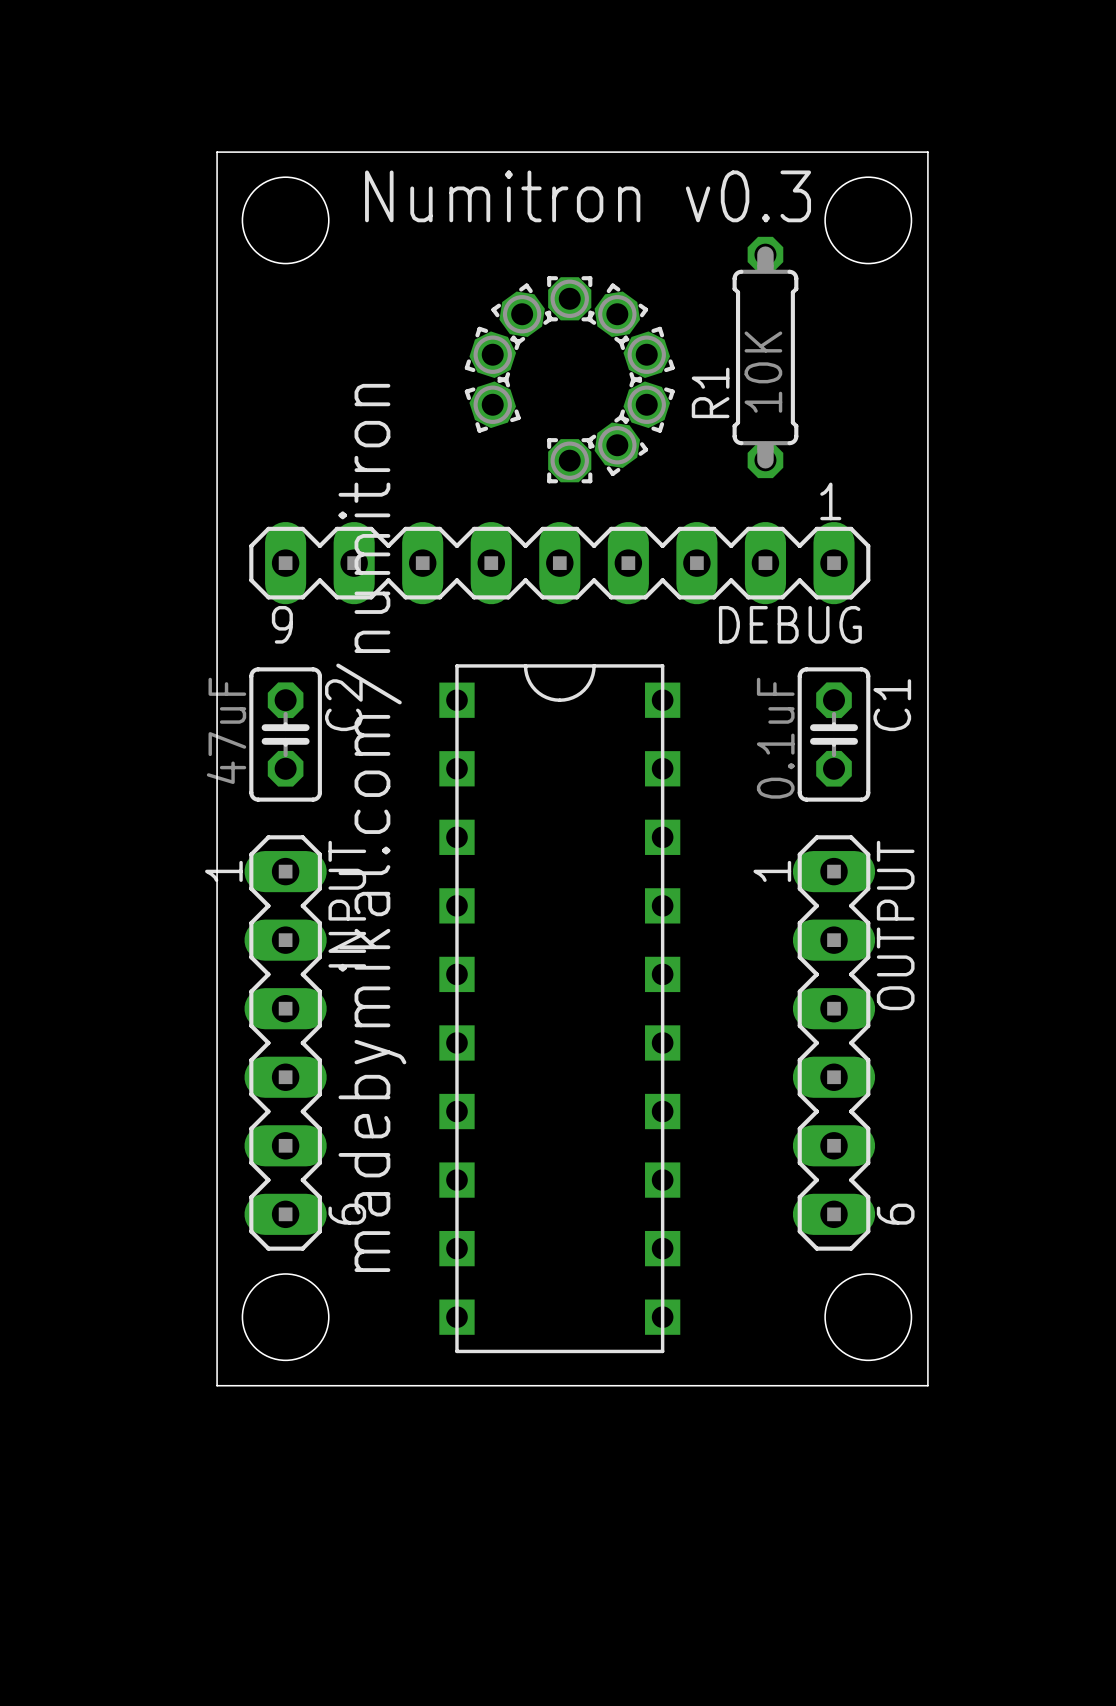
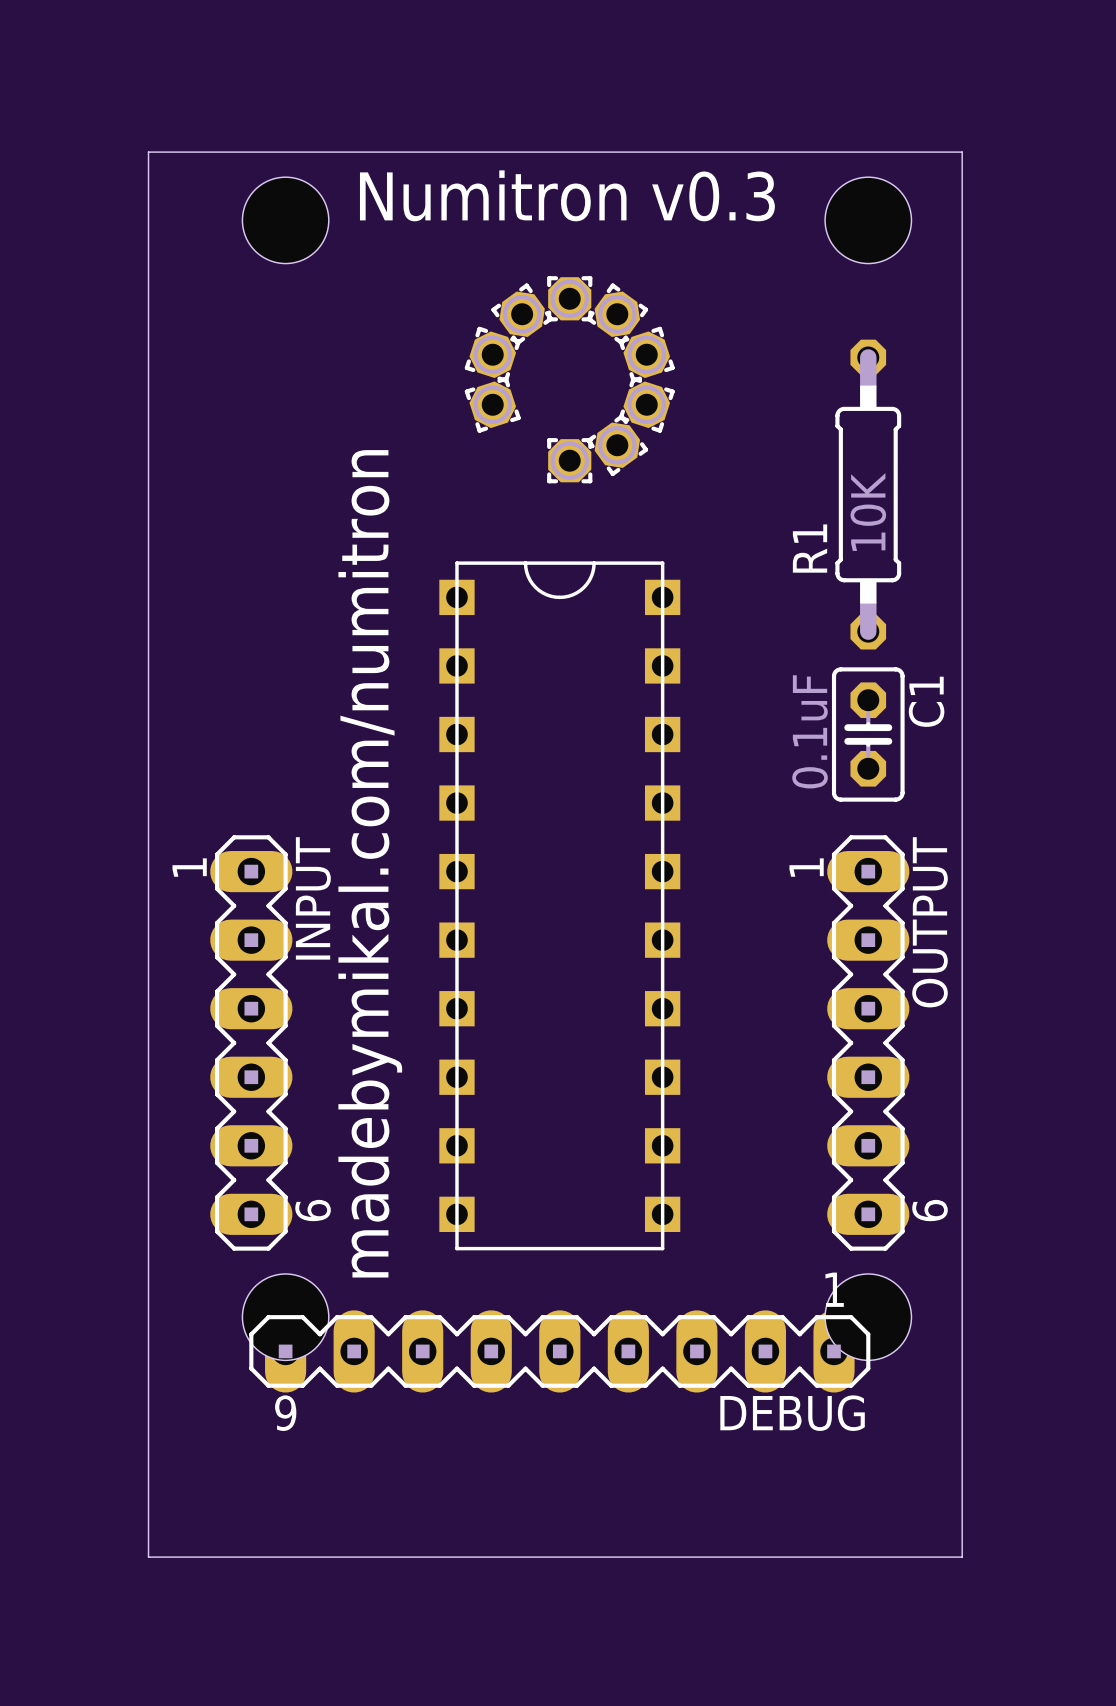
board edge: (217, 152) (217, 1385) (927, 1385) (927, 152) -> (217, 152) (148, 152) (148, 1557) (962, 1557) (962, 152) (927, 152)
R1 footprint: [732, 236, 799, 479] -> [835, 339, 902, 650]
DEBUG: (559, 563) -> none
C2: 47uF (285, 734) -> none
C1 position: (834, 734) -> (868, 734)
part position: (559, 1008) -> (559, 905)
INPUT position: (285, 1042) -> (251, 1042)
OUTPUT position: (834, 1042) -> (868, 1042)
DEBUG: none -> (559, 1351)

